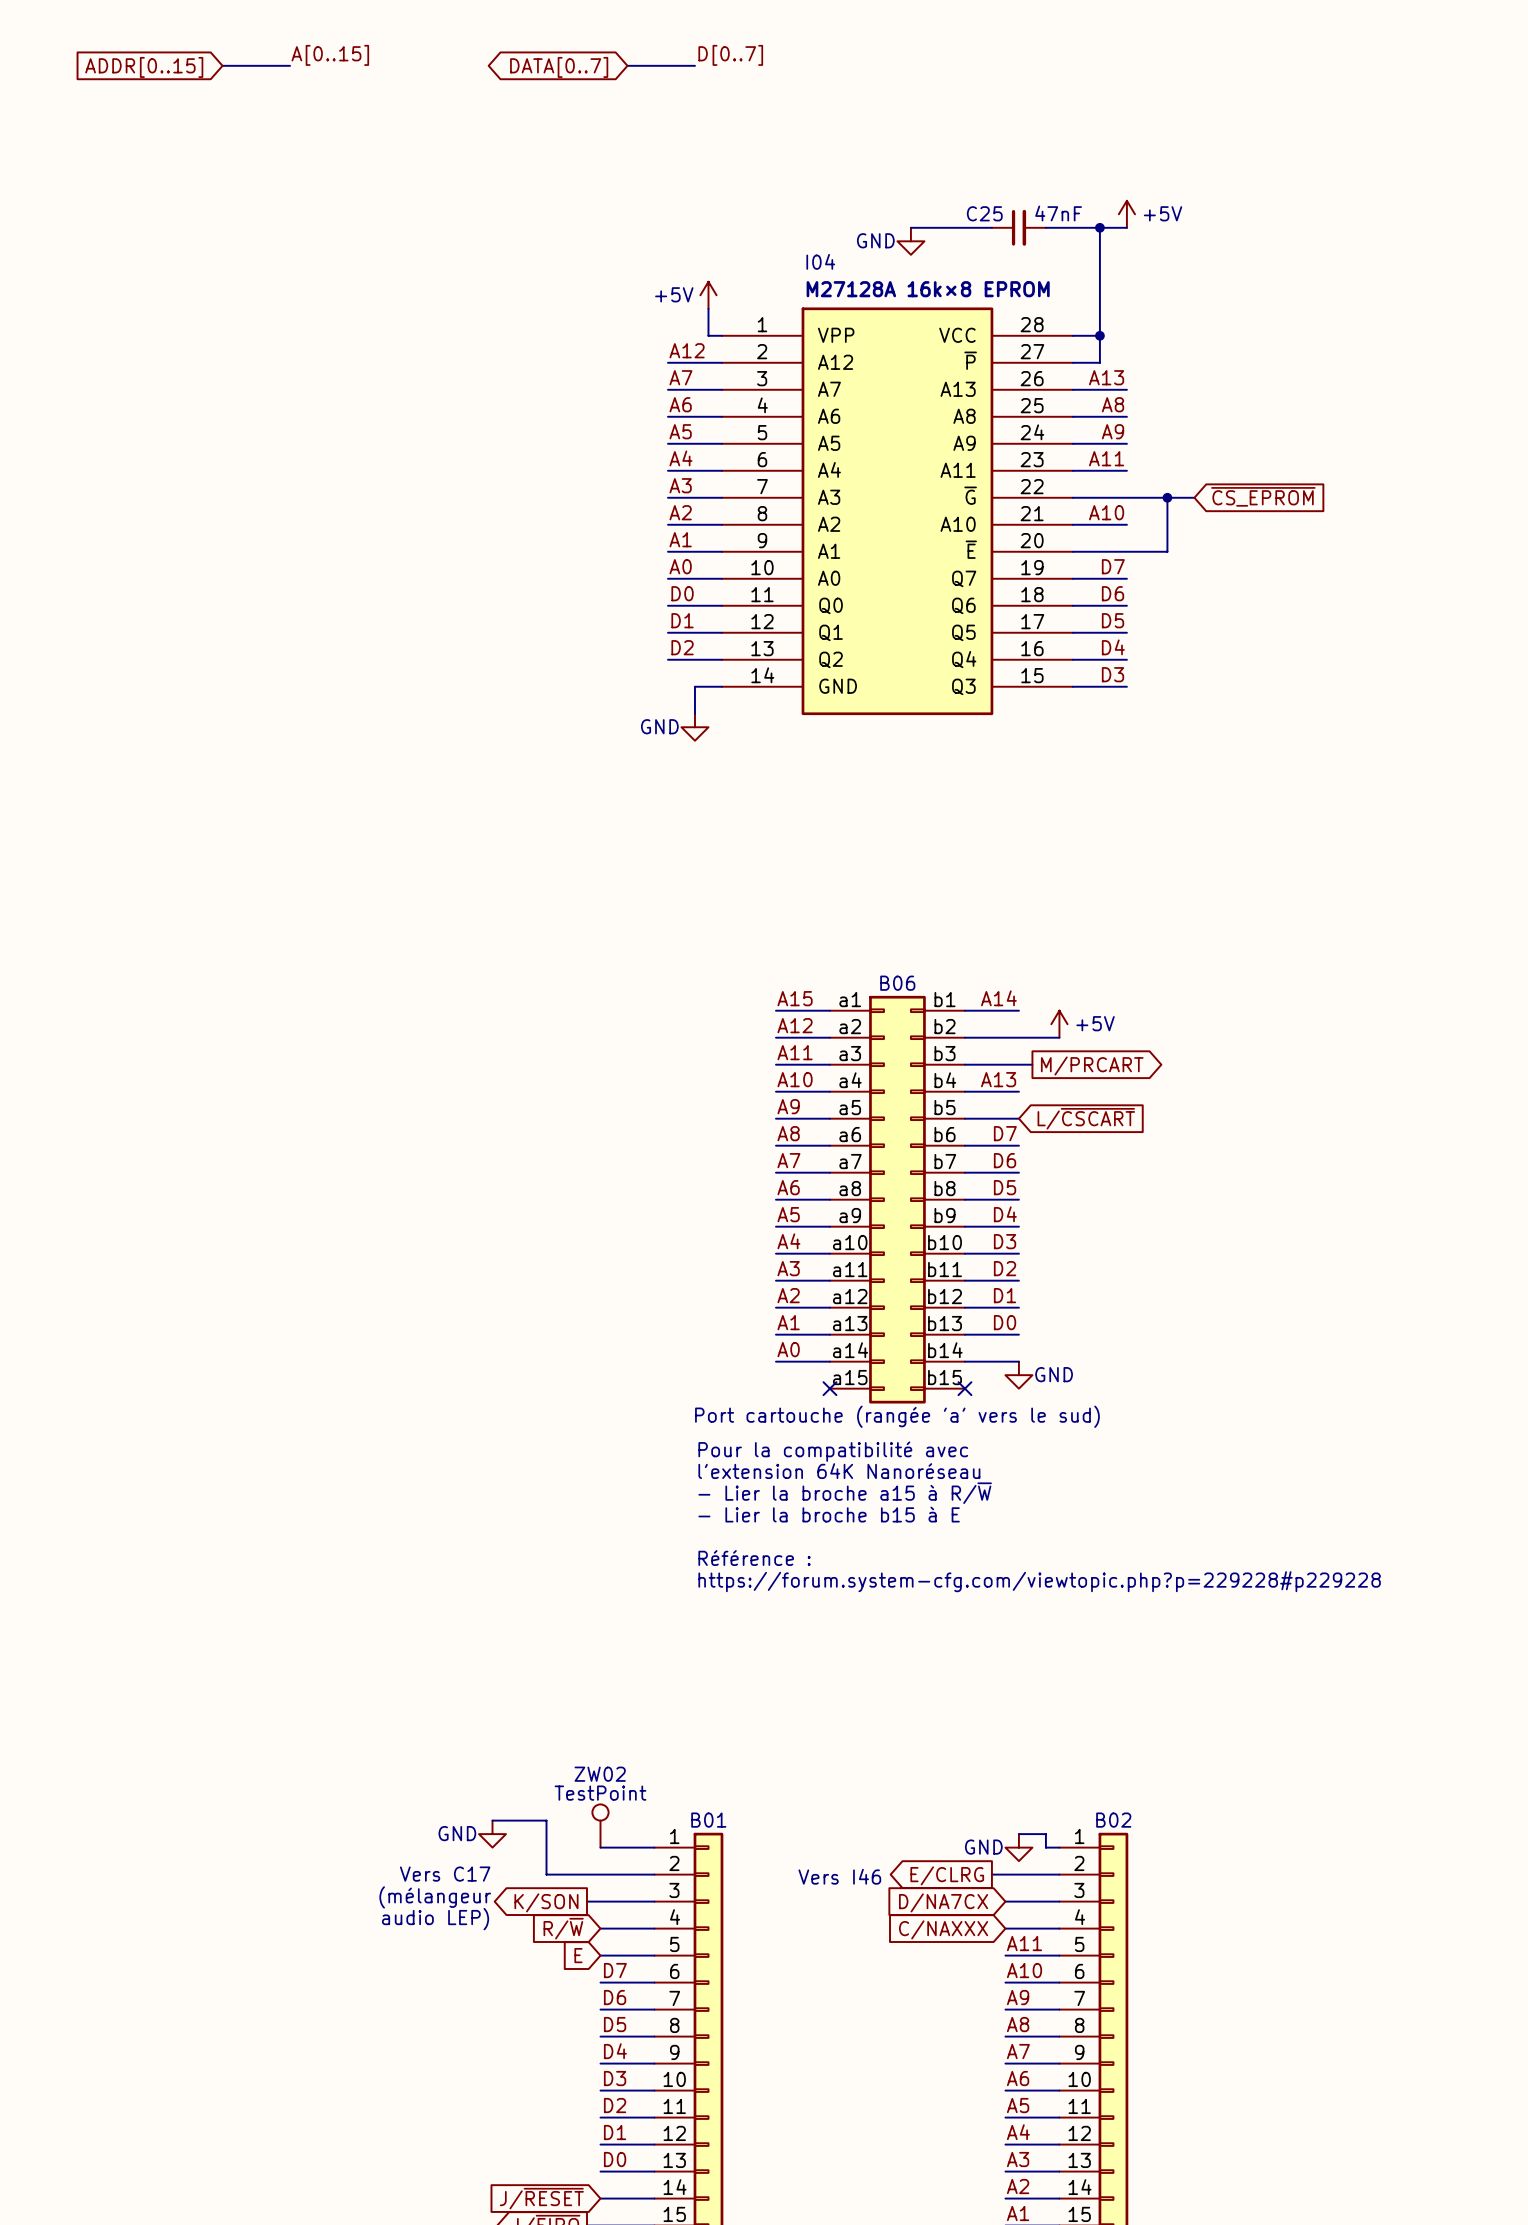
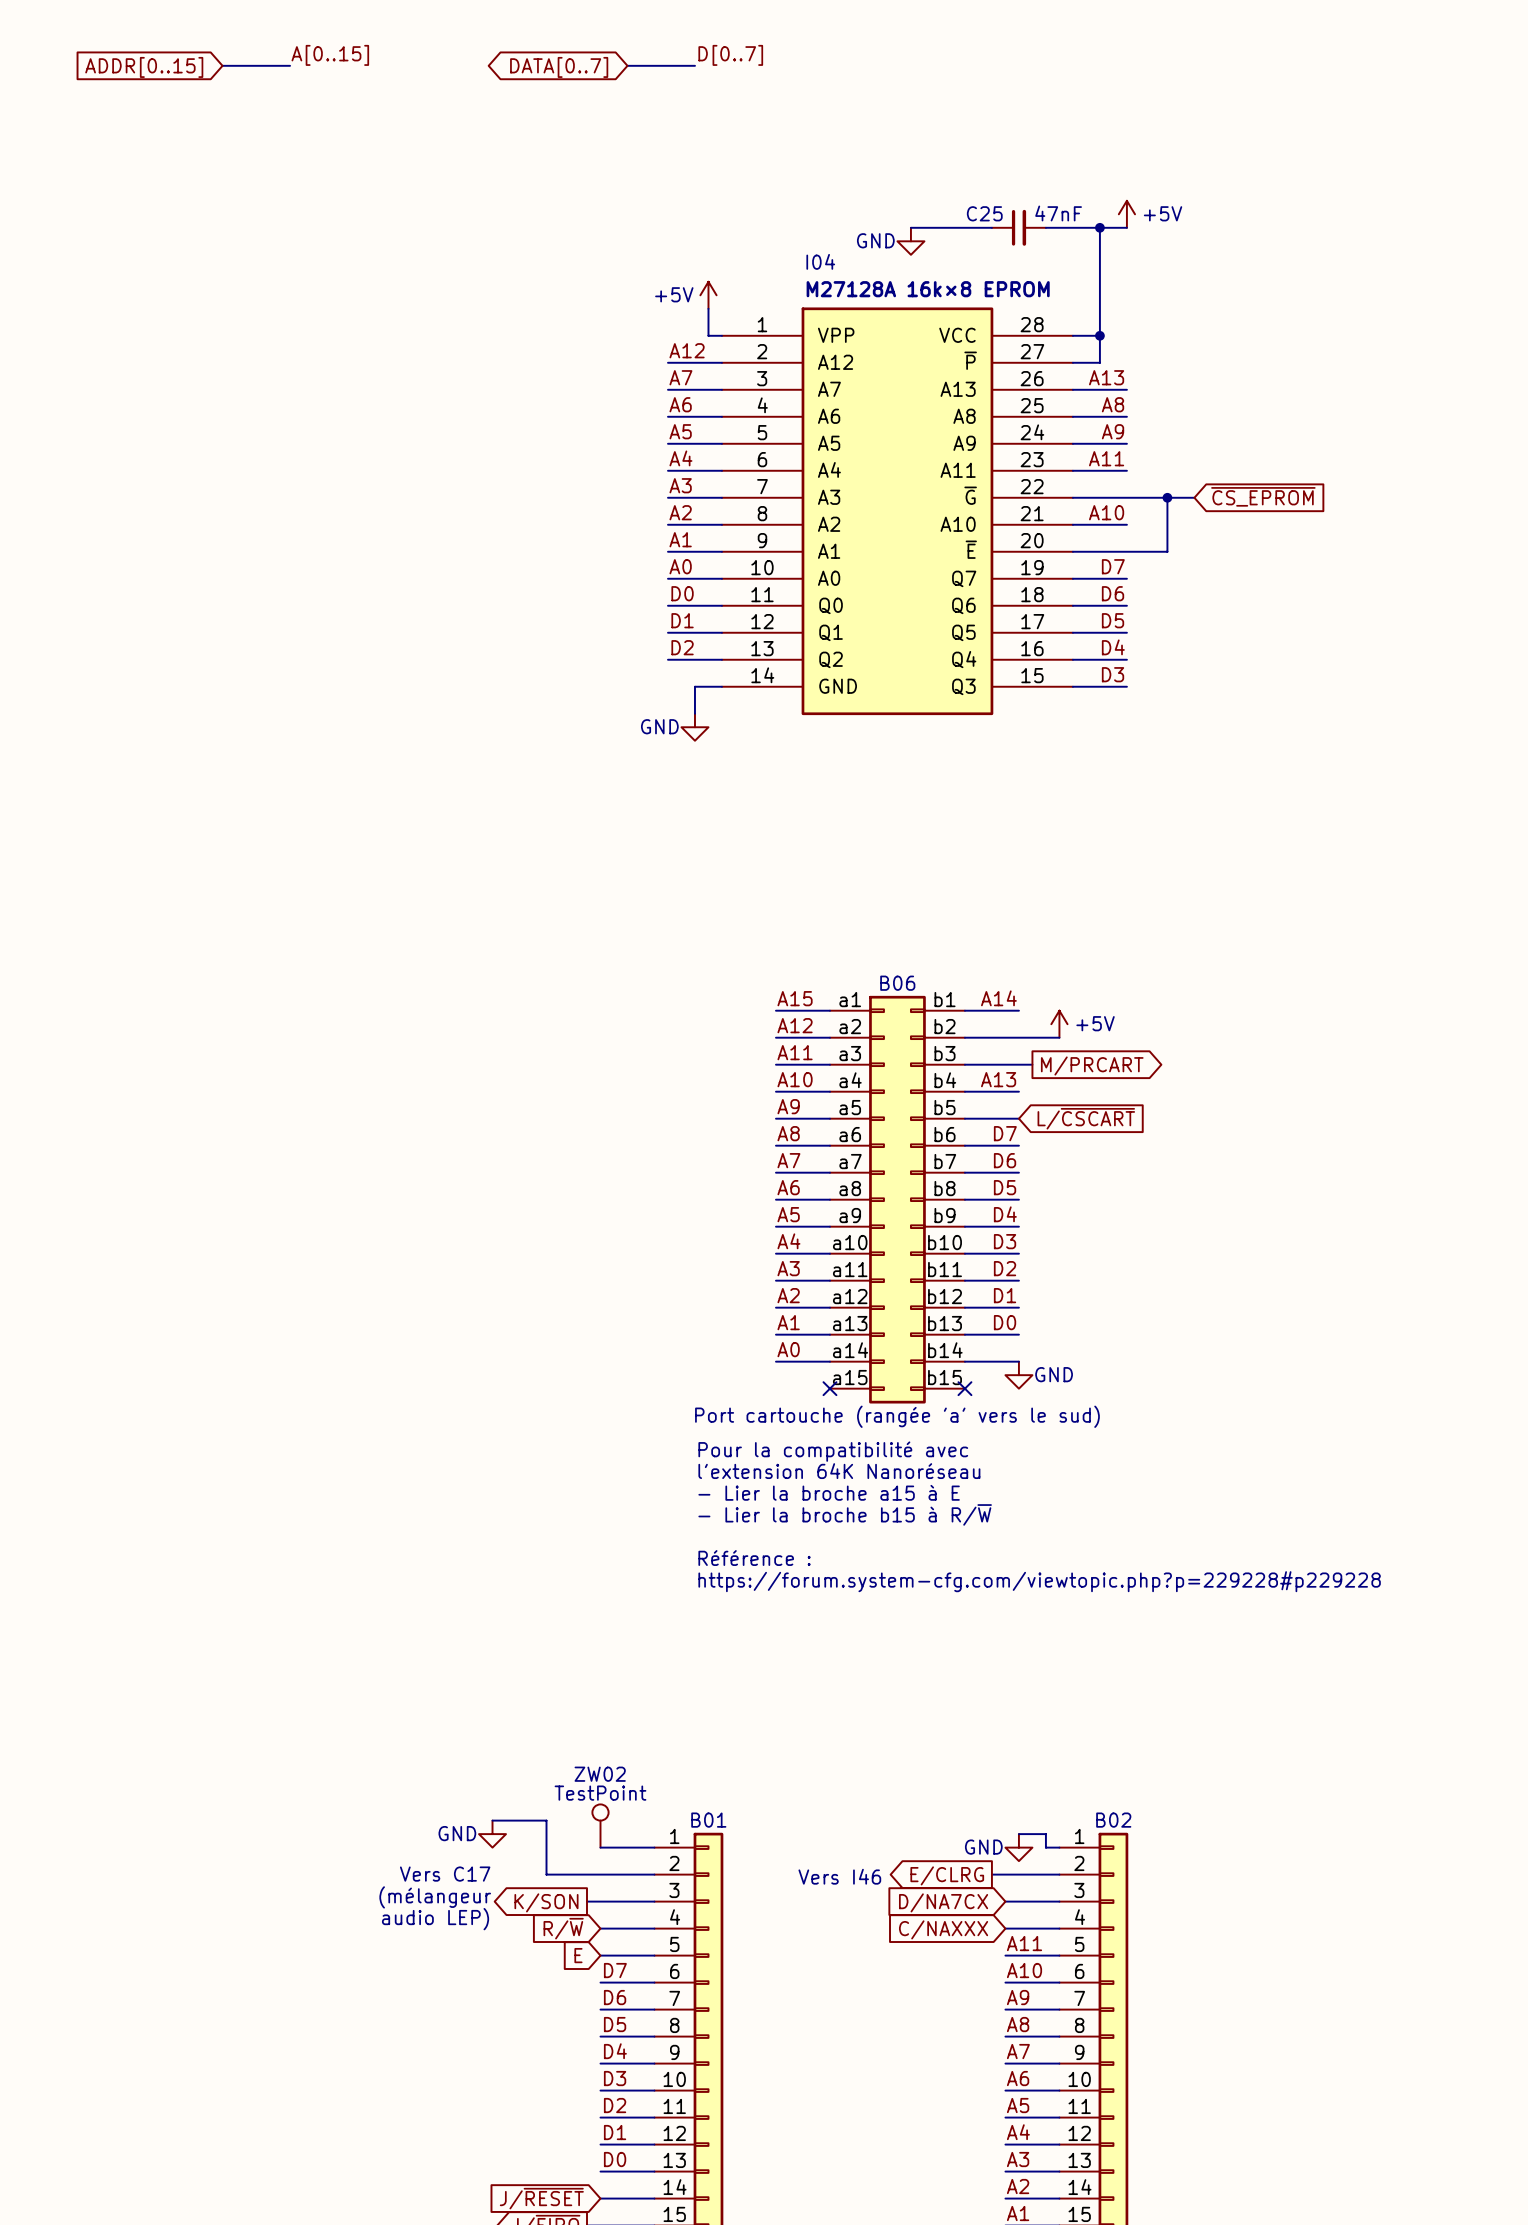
text: - Lier la broche a15 à R/~{W} (845, 1493) -> - Lier la broche a15 à E (829, 1492)
text: - Lier la broche b15 à E (829, 1514) -> - Lier la broche b15 à R/~{W} (845, 1514)

